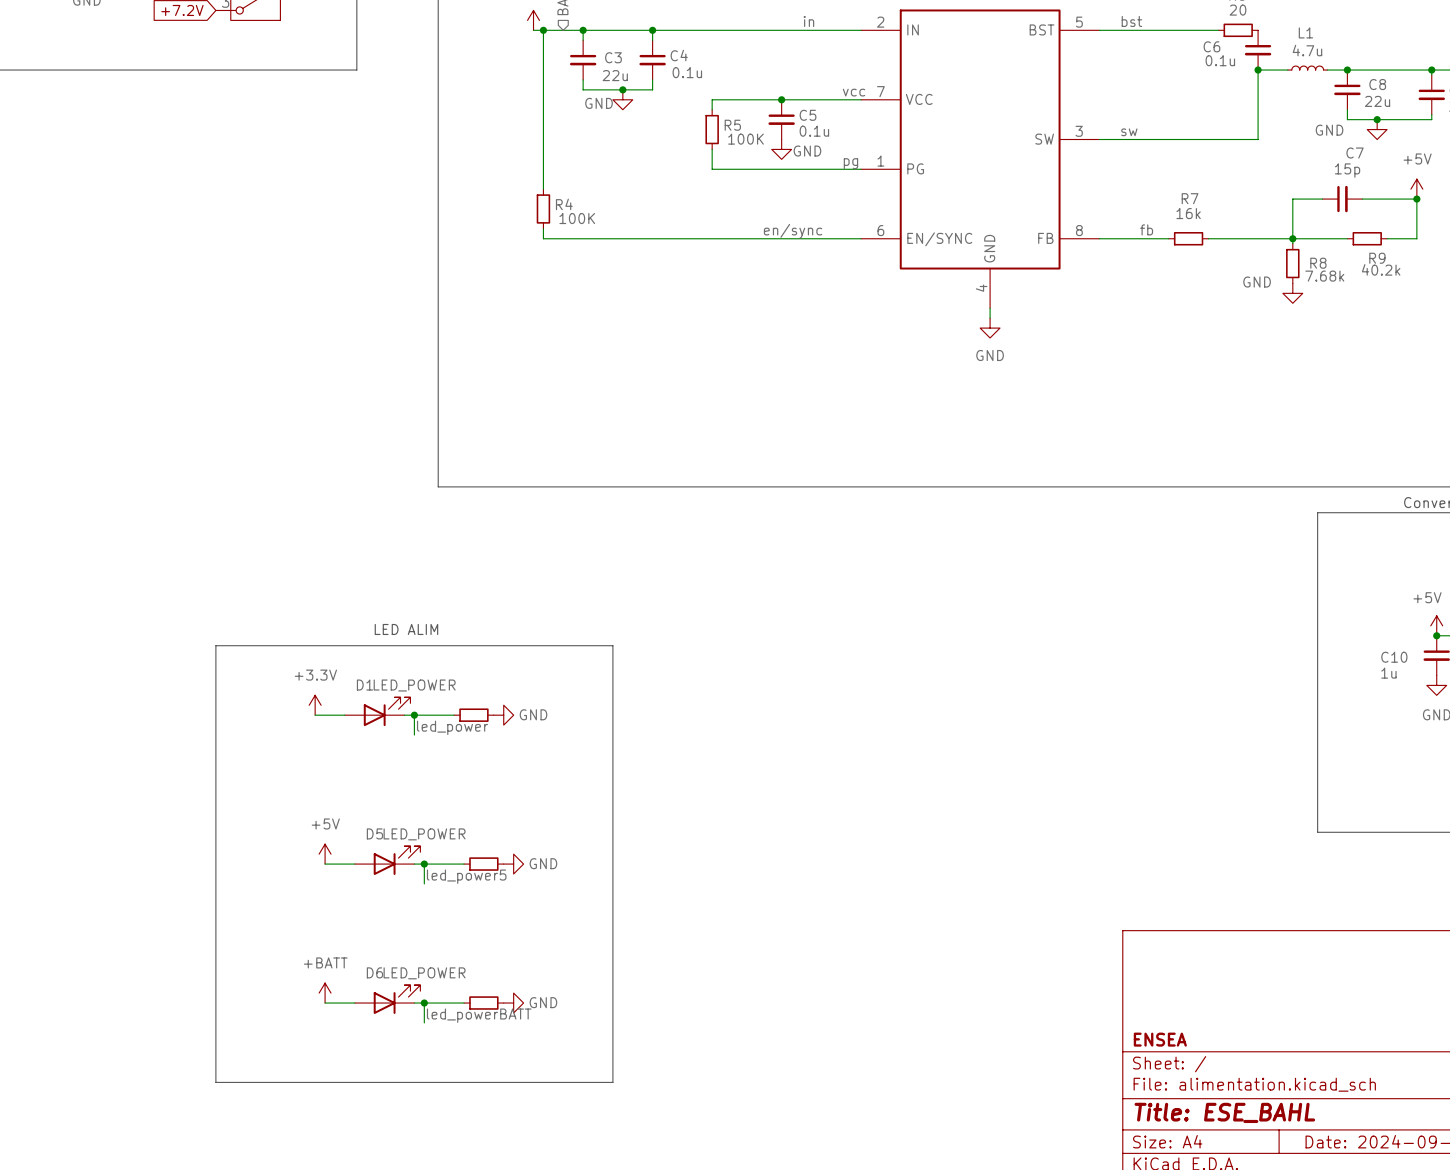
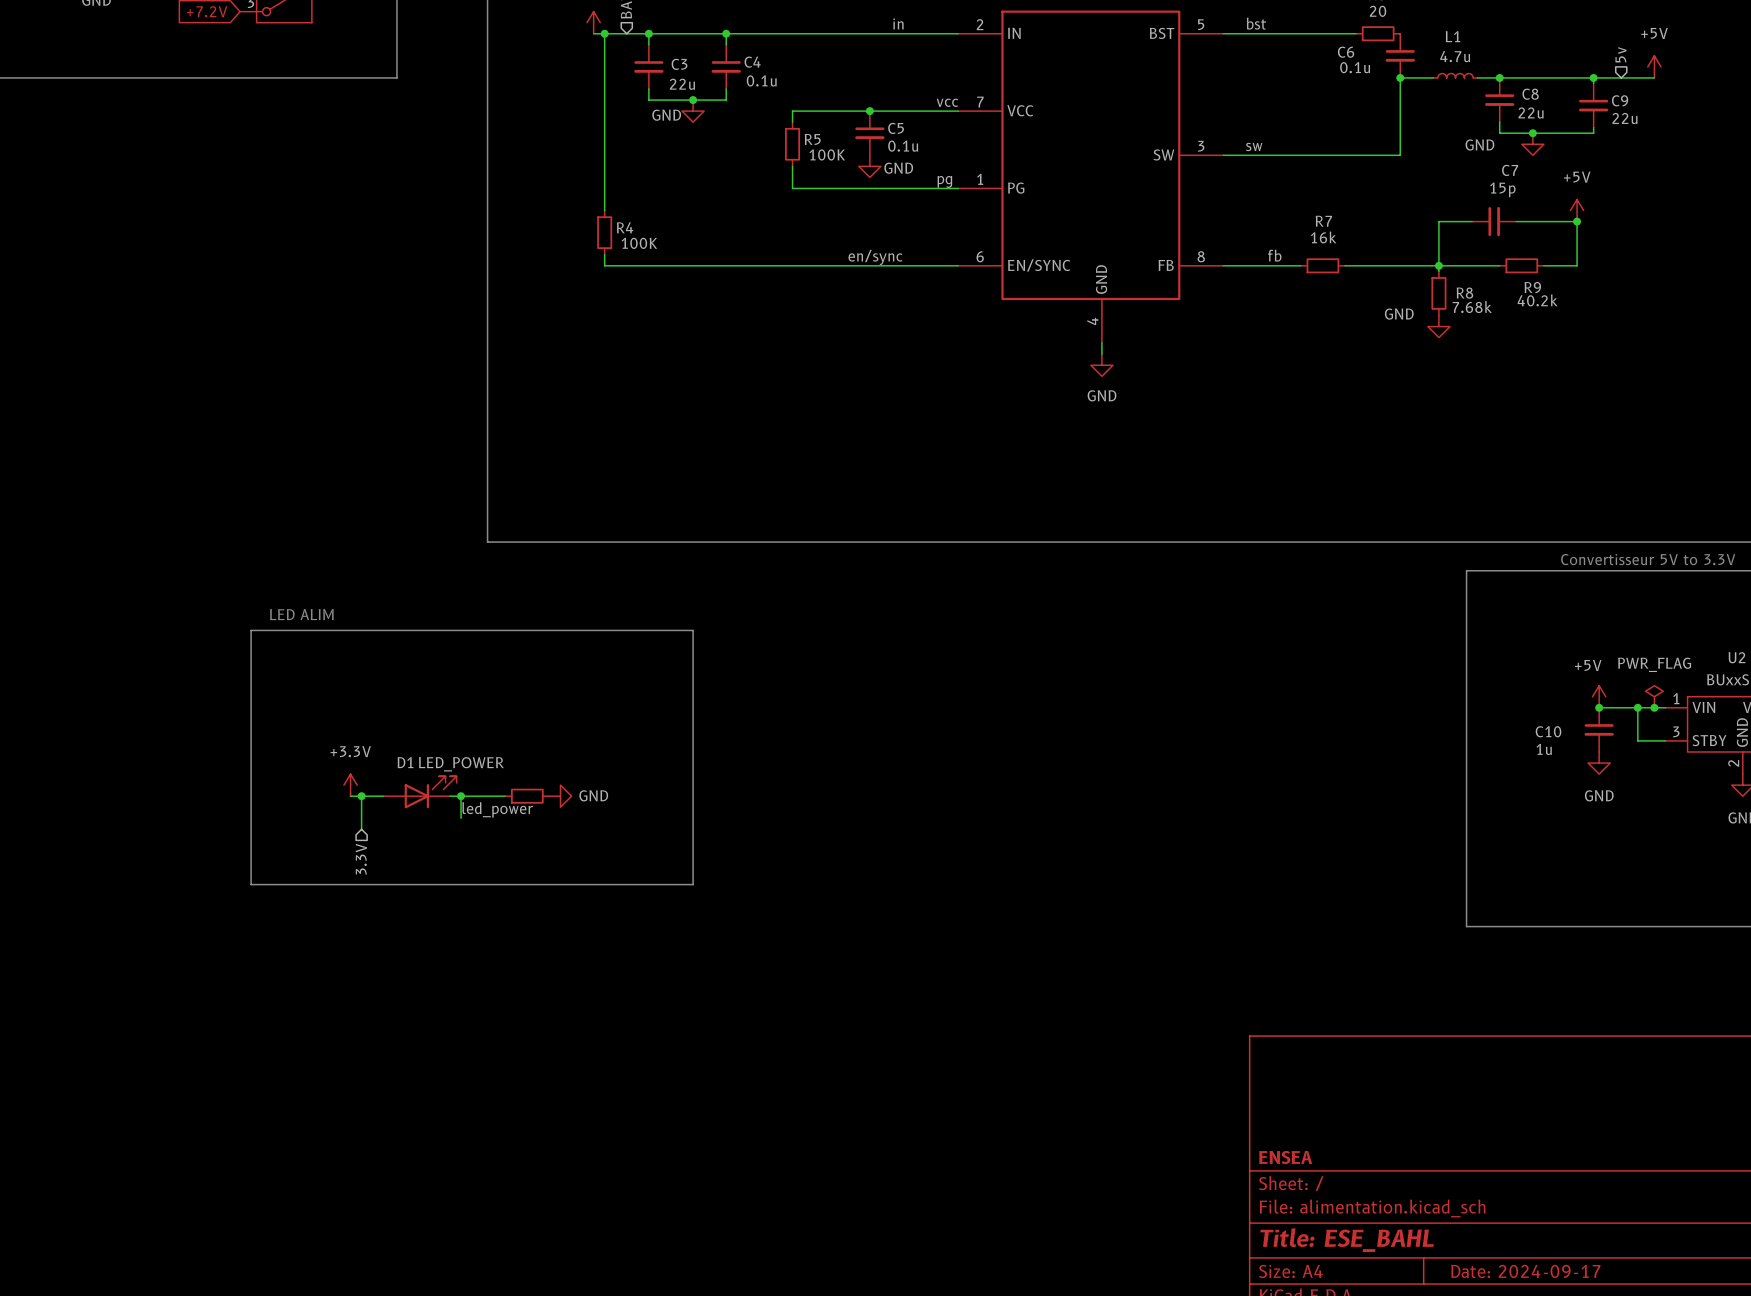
line: none -> (251, 630) (693, 630) (693, 884) (251, 884) (251, 630)
text position: LED ALIM (406, 629) -> LED ALIM (301, 614)
line: (215, 645) (612, 645) (612, 1082) (215, 1082) (215, 645) -> none
wire: none -> (361, 796) (361, 829)
junction: none -> (361, 796)
hierarchical label: none -> 3.3V (361, 859)
power symbol: +5V (325, 854) -> none
D5: LED_POWER (387, 860) -> none
wire: (325, 864) (354, 864) -> none
wire: (414, 864) (464, 864) -> none
wire: (424, 864) (424, 883) -> none
junction: (424, 864) -> none
part: (483, 864) -> none
power symbol: GND (513, 864) -> none
label: led_power5 (466, 876) -> none
power symbol: +BATT (325, 993) -> none
D6: LED_POWER (387, 999) -> none
wire: (325, 1003) (354, 1003) -> none
wire: (414, 1003) (464, 1003) -> none
wire: (424, 1003) (424, 1022) -> none
junction: (424, 1003) -> none
part: (483, 1003) -> none
power symbol: GND (513, 1003) -> none
label: led_powerBATT (479, 1015) -> none

